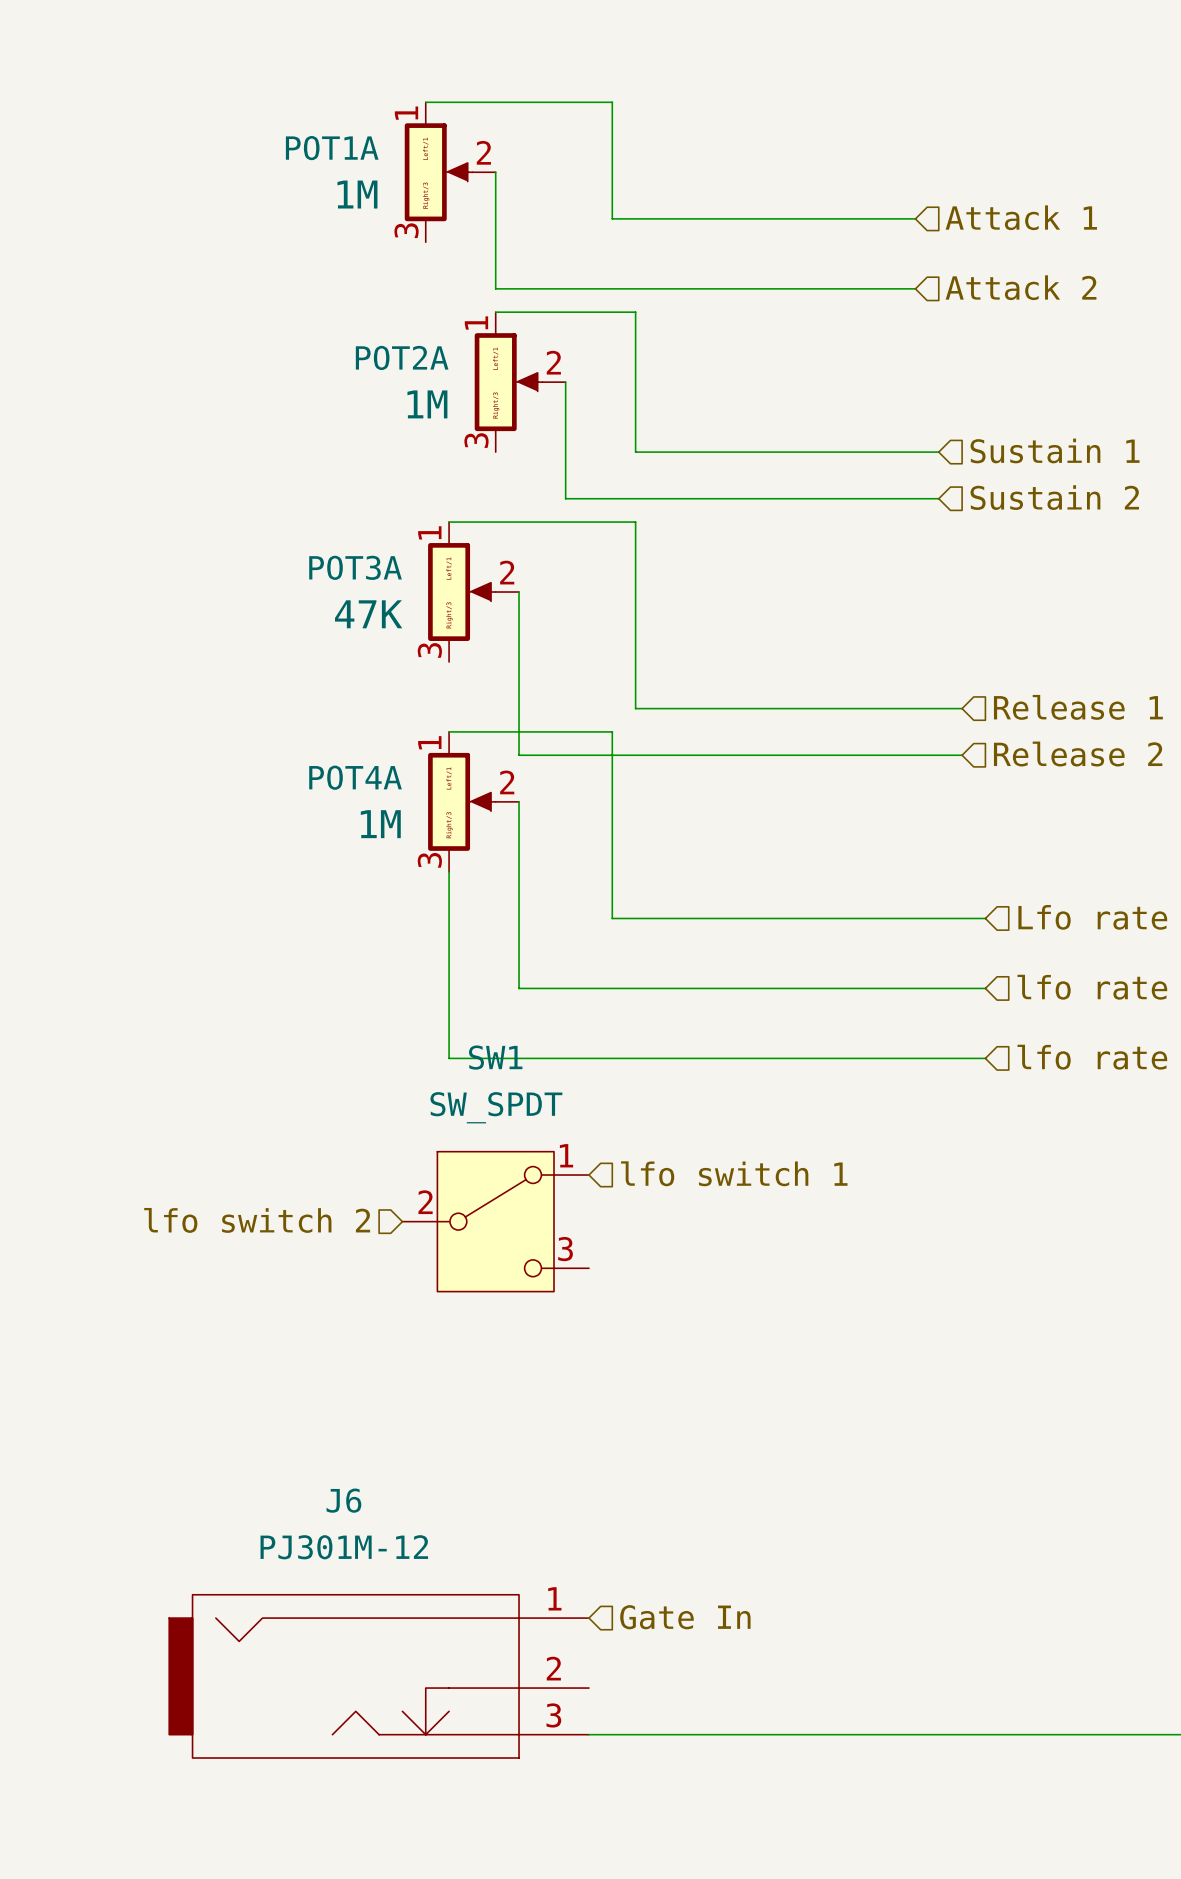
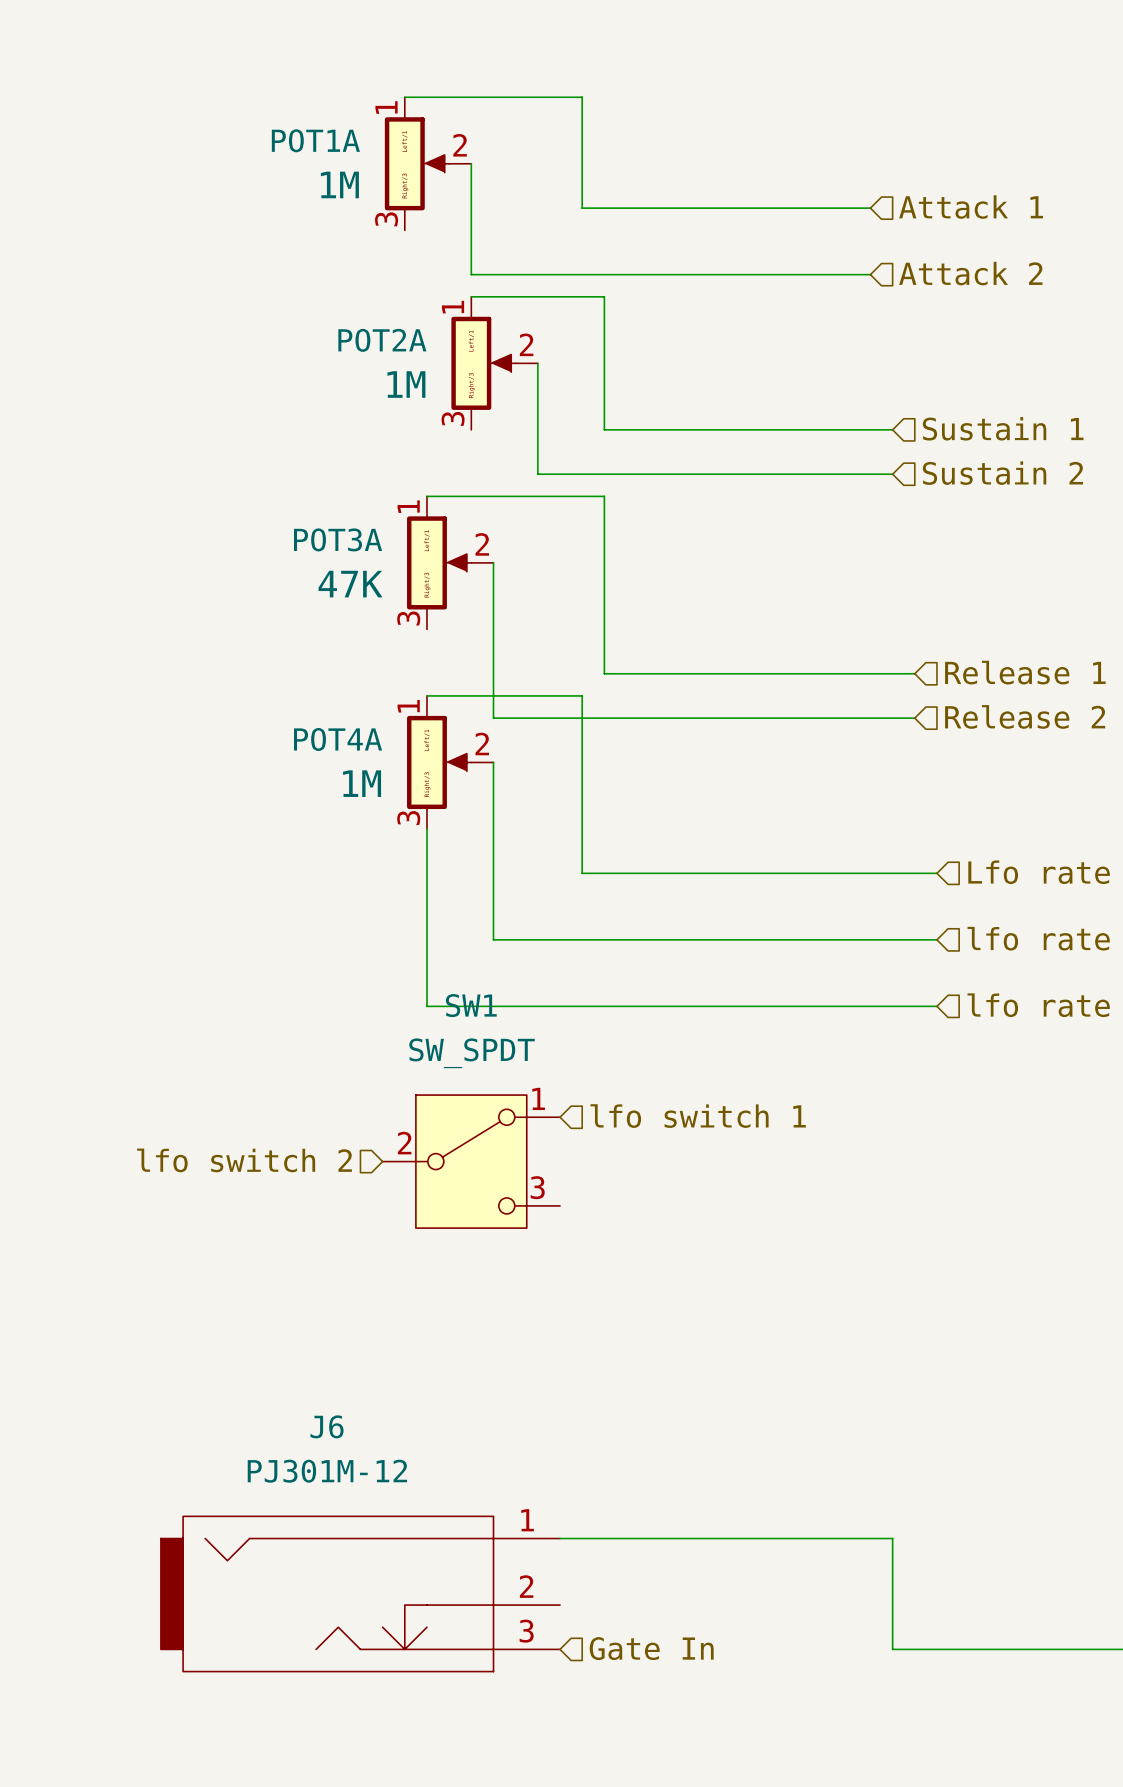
hierarchical label position: Gate In (685, 1617) -> Gate In (651, 1648)
wire: (588, 1734) (938, 1734) -> (560, 1538) (892, 1538) (892, 1649)

